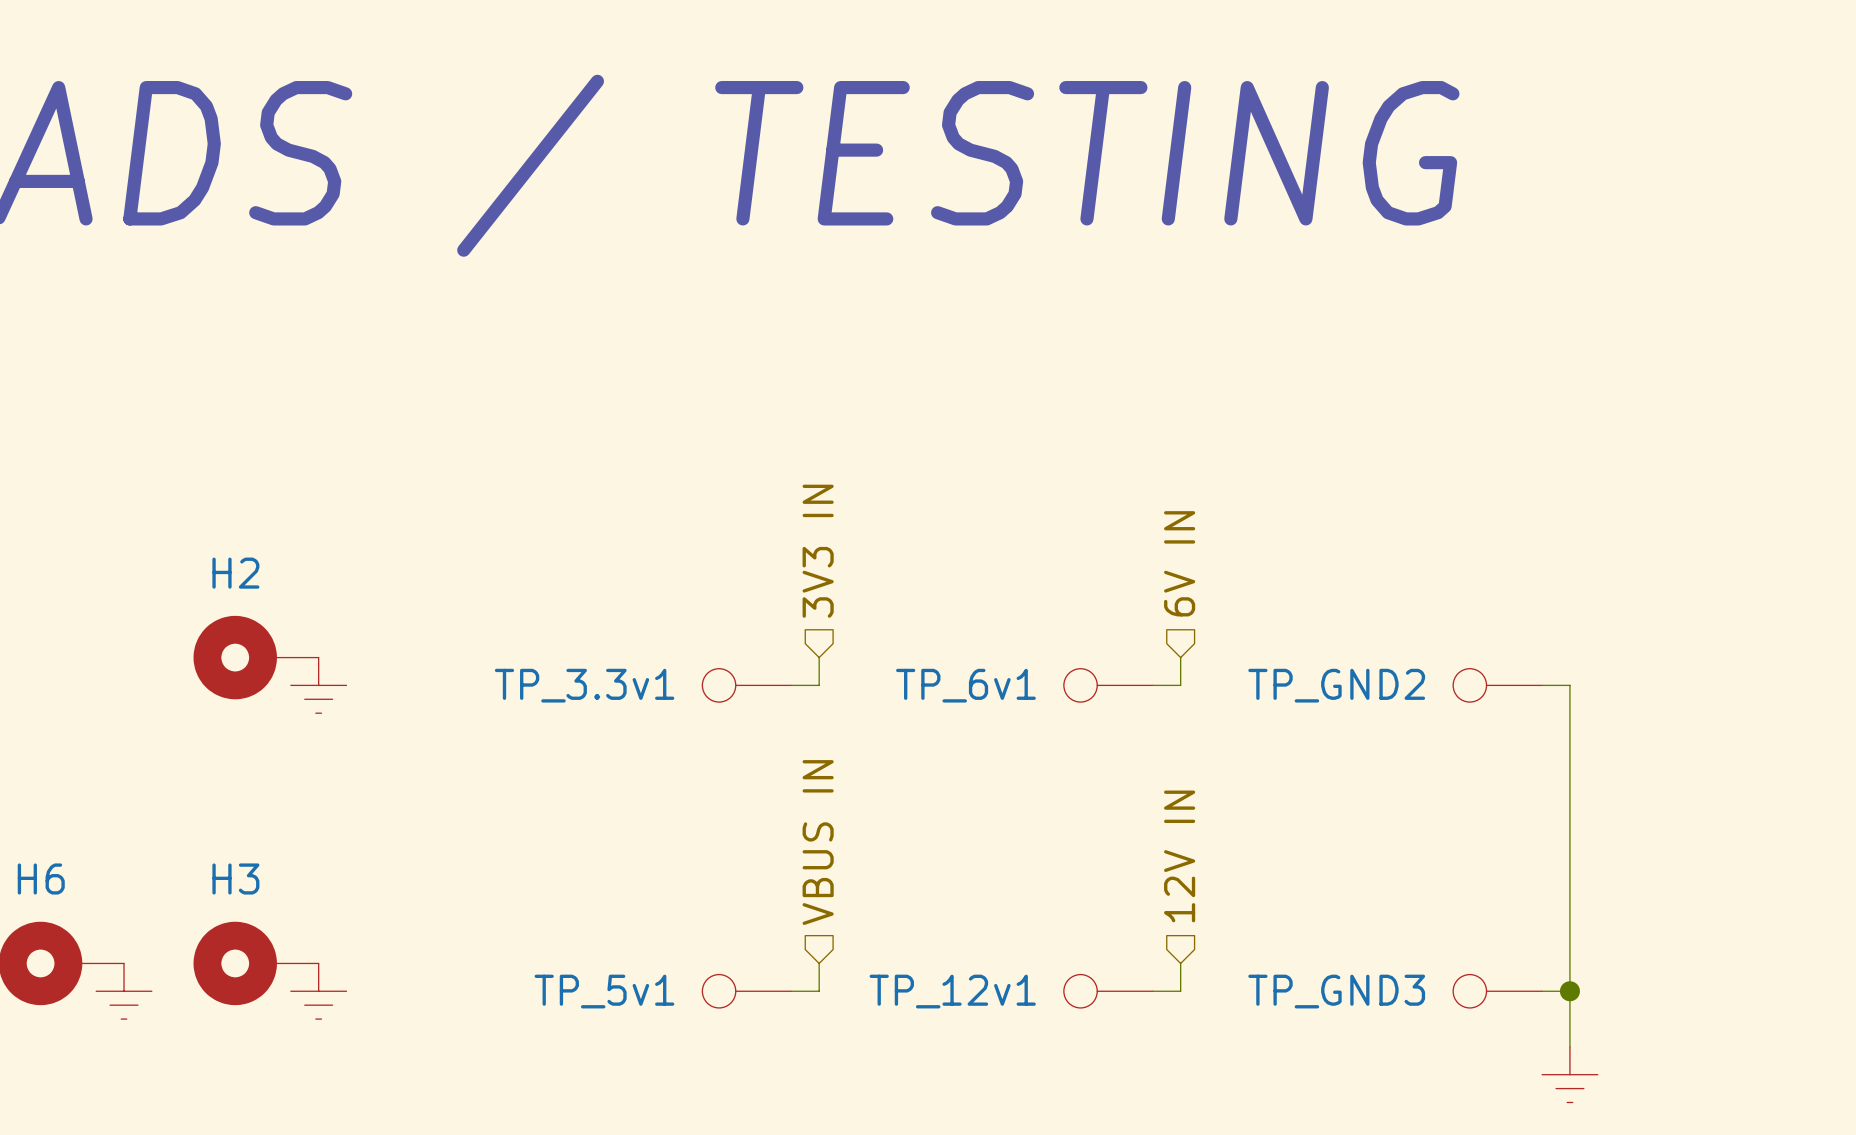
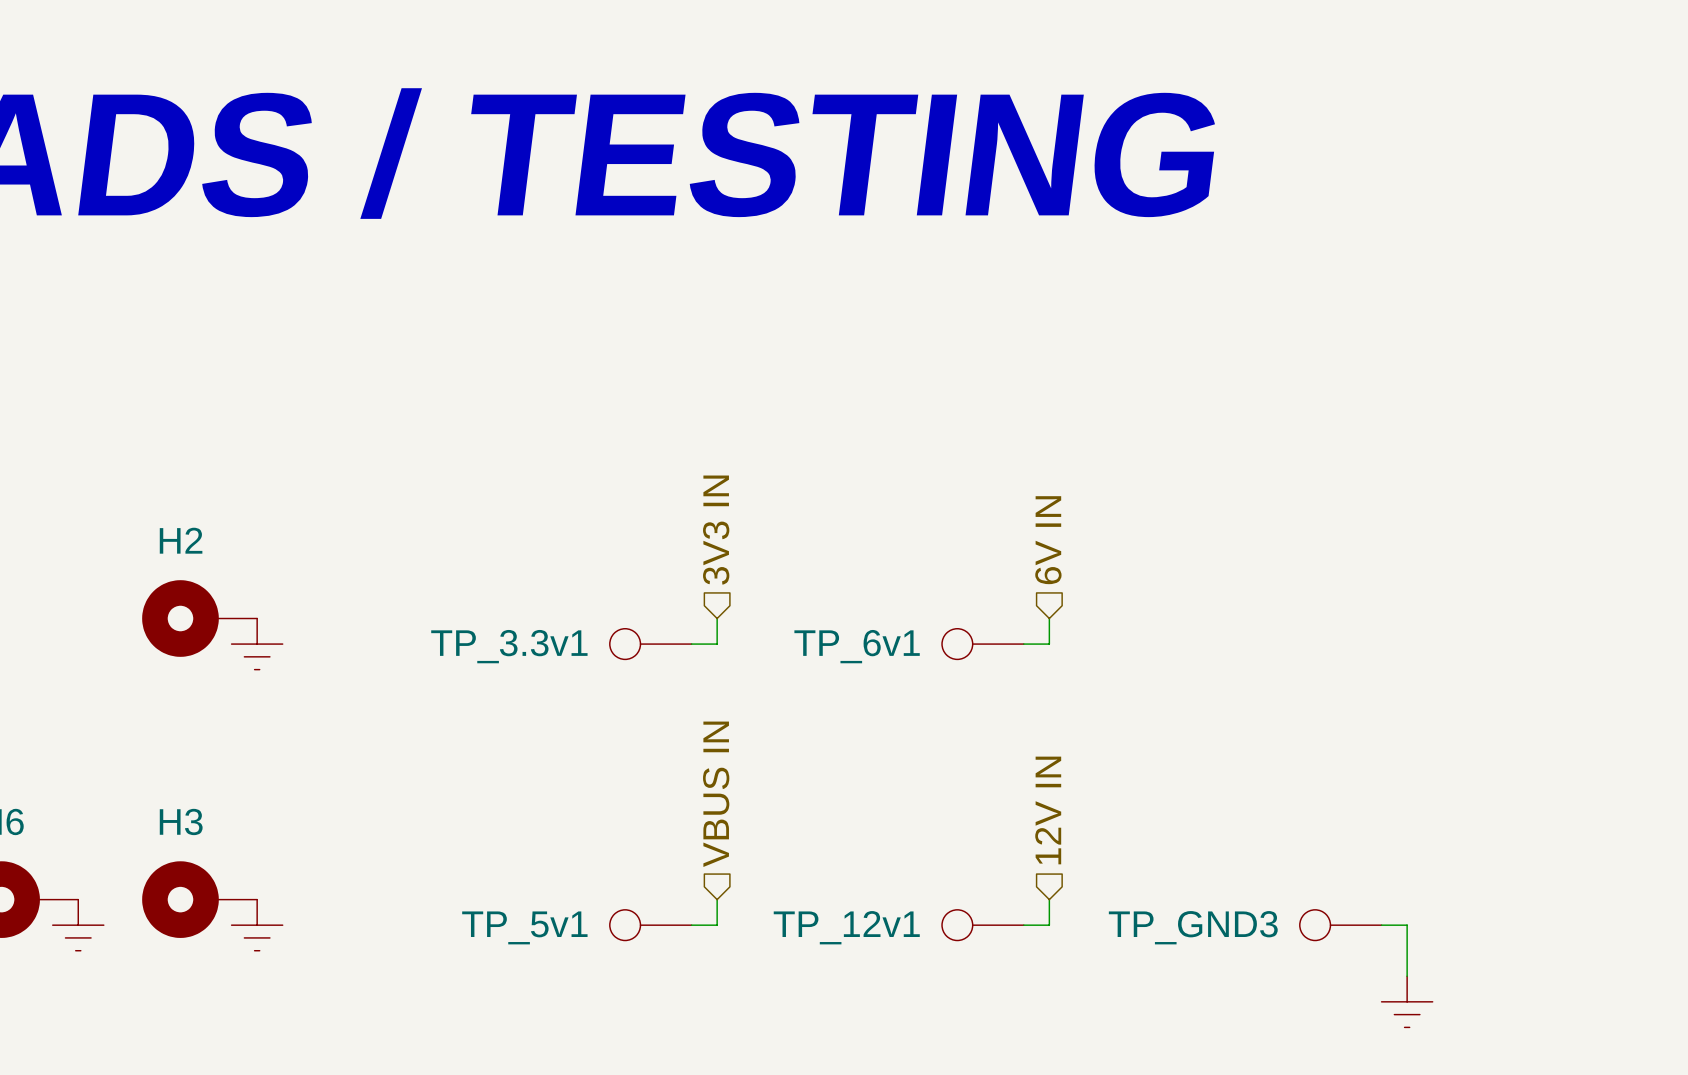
TP_GND2: (1497, 685) -> none
wire: (1542, 685) (1569, 685) (1569, 991) -> none
junction: (1569, 991) -> none

